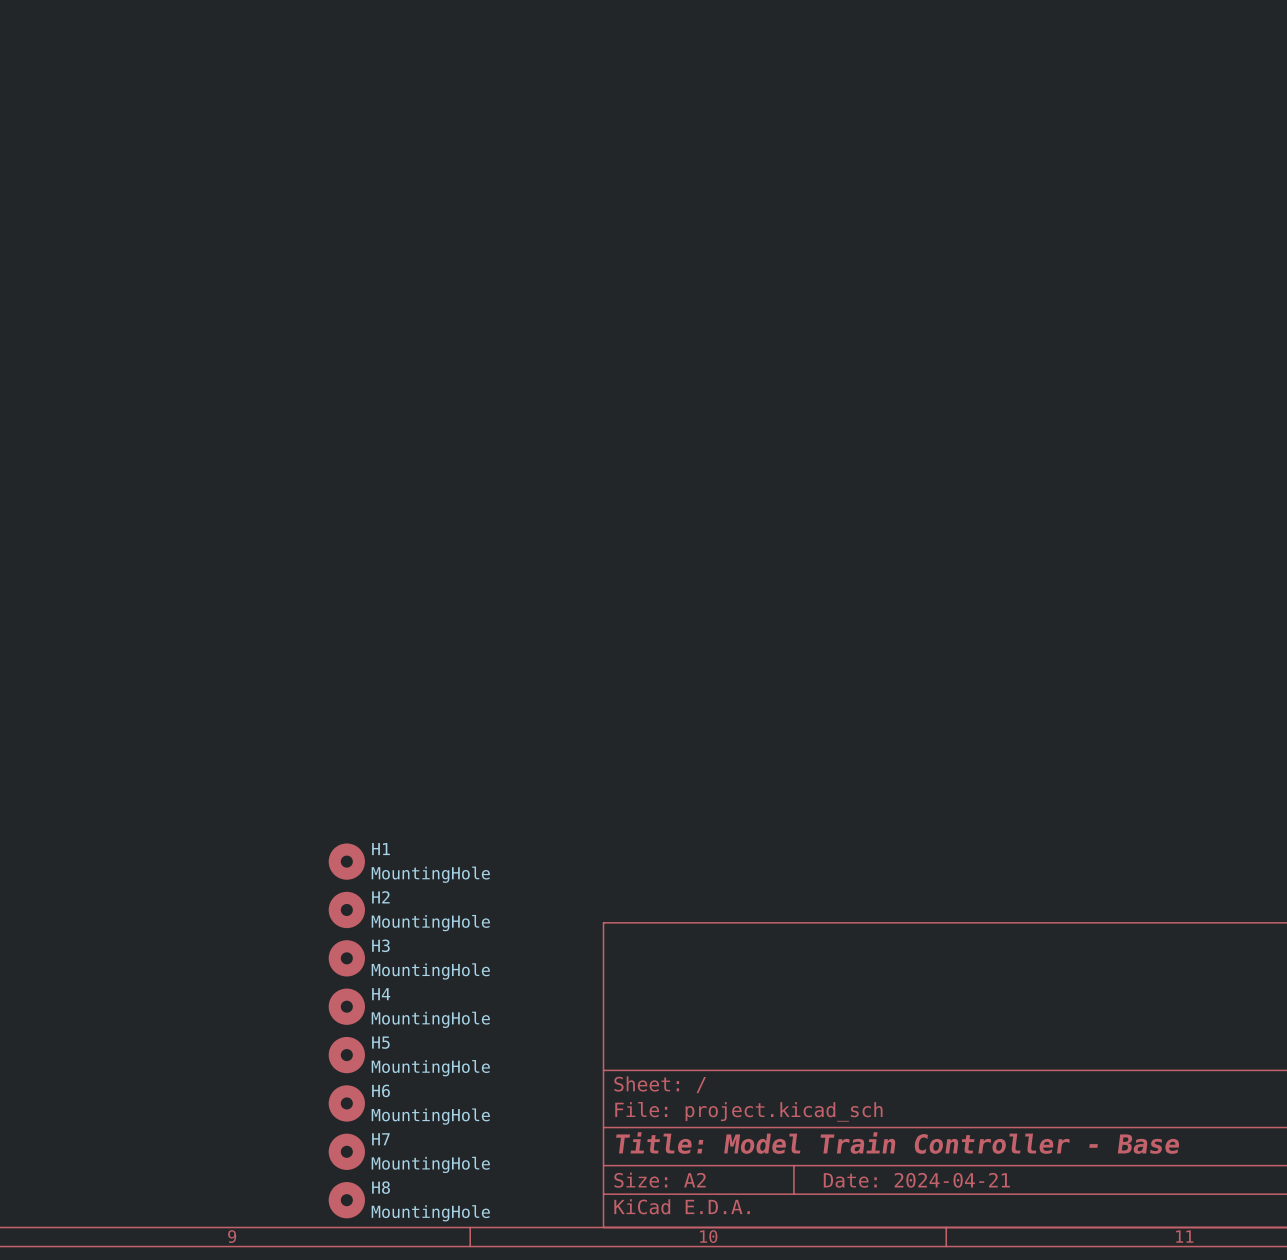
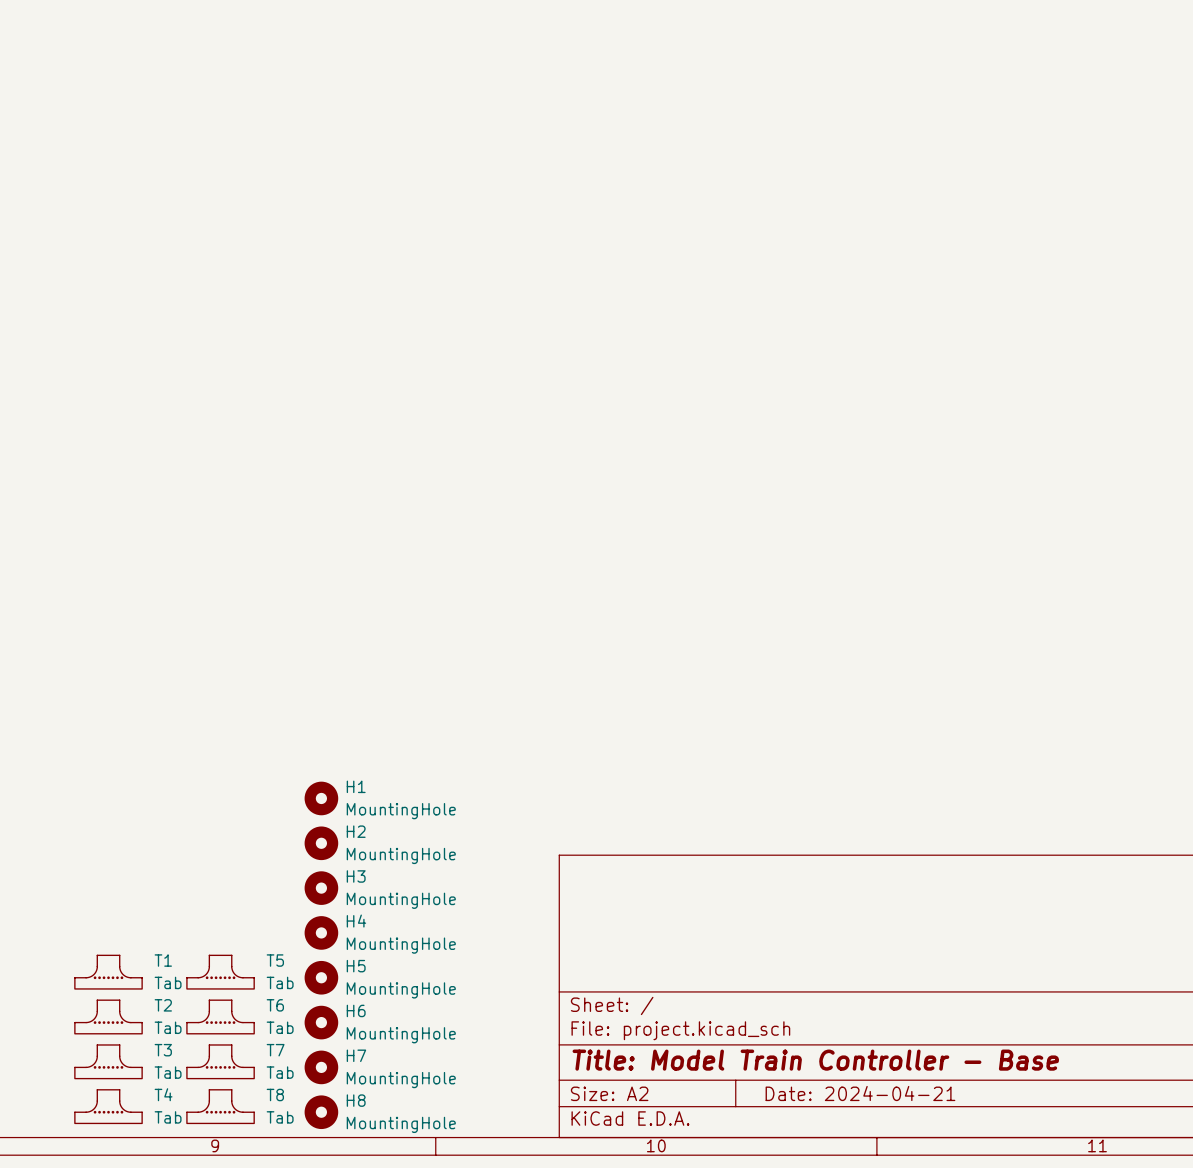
T1: none -> Tab (108, 972)
T5: none -> Tab (220, 972)
T2: none -> Tab (108, 1016)
T6: none -> Tab (220, 1016)
T3: none -> Tab (108, 1061)
T7: none -> Tab (220, 1061)
T4: none -> Tab (108, 1106)
T8: none -> Tab (220, 1106)

